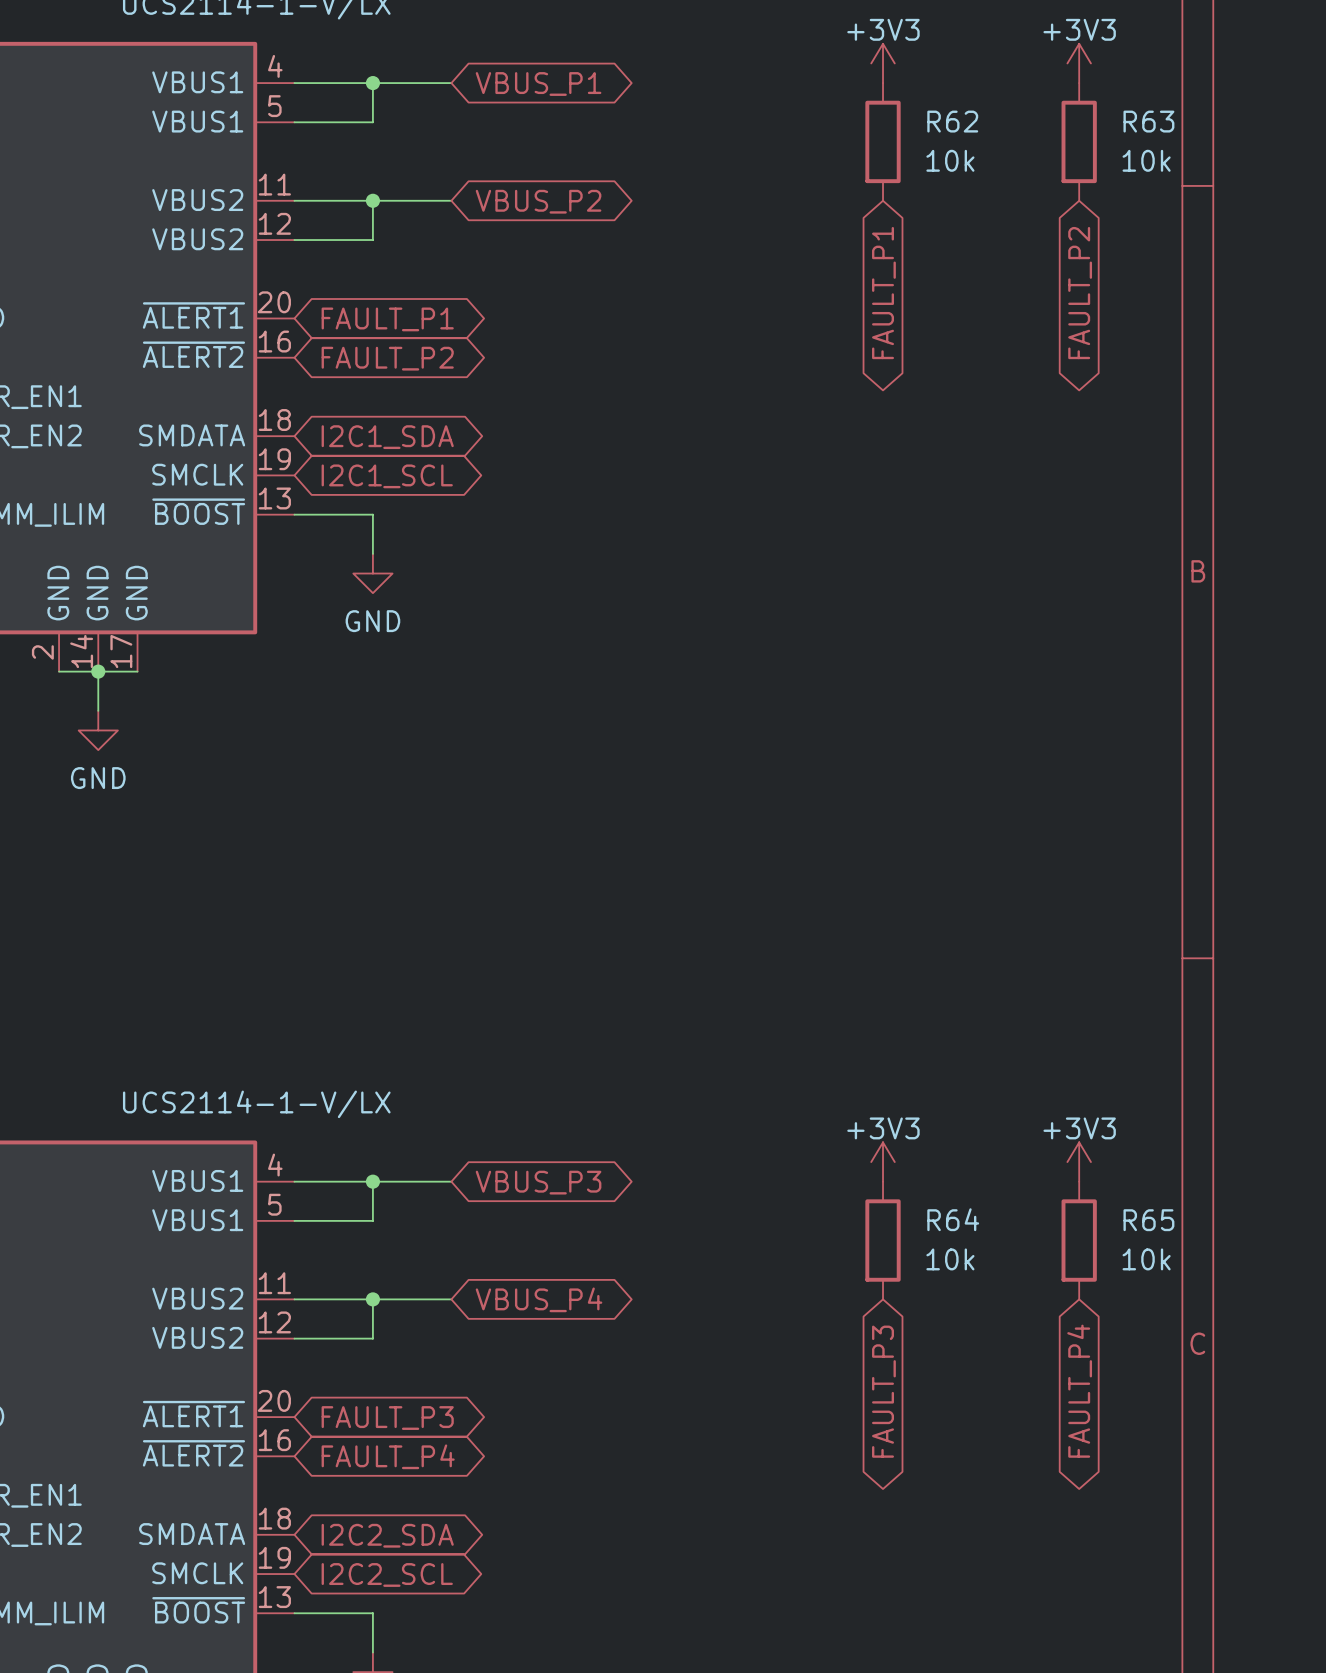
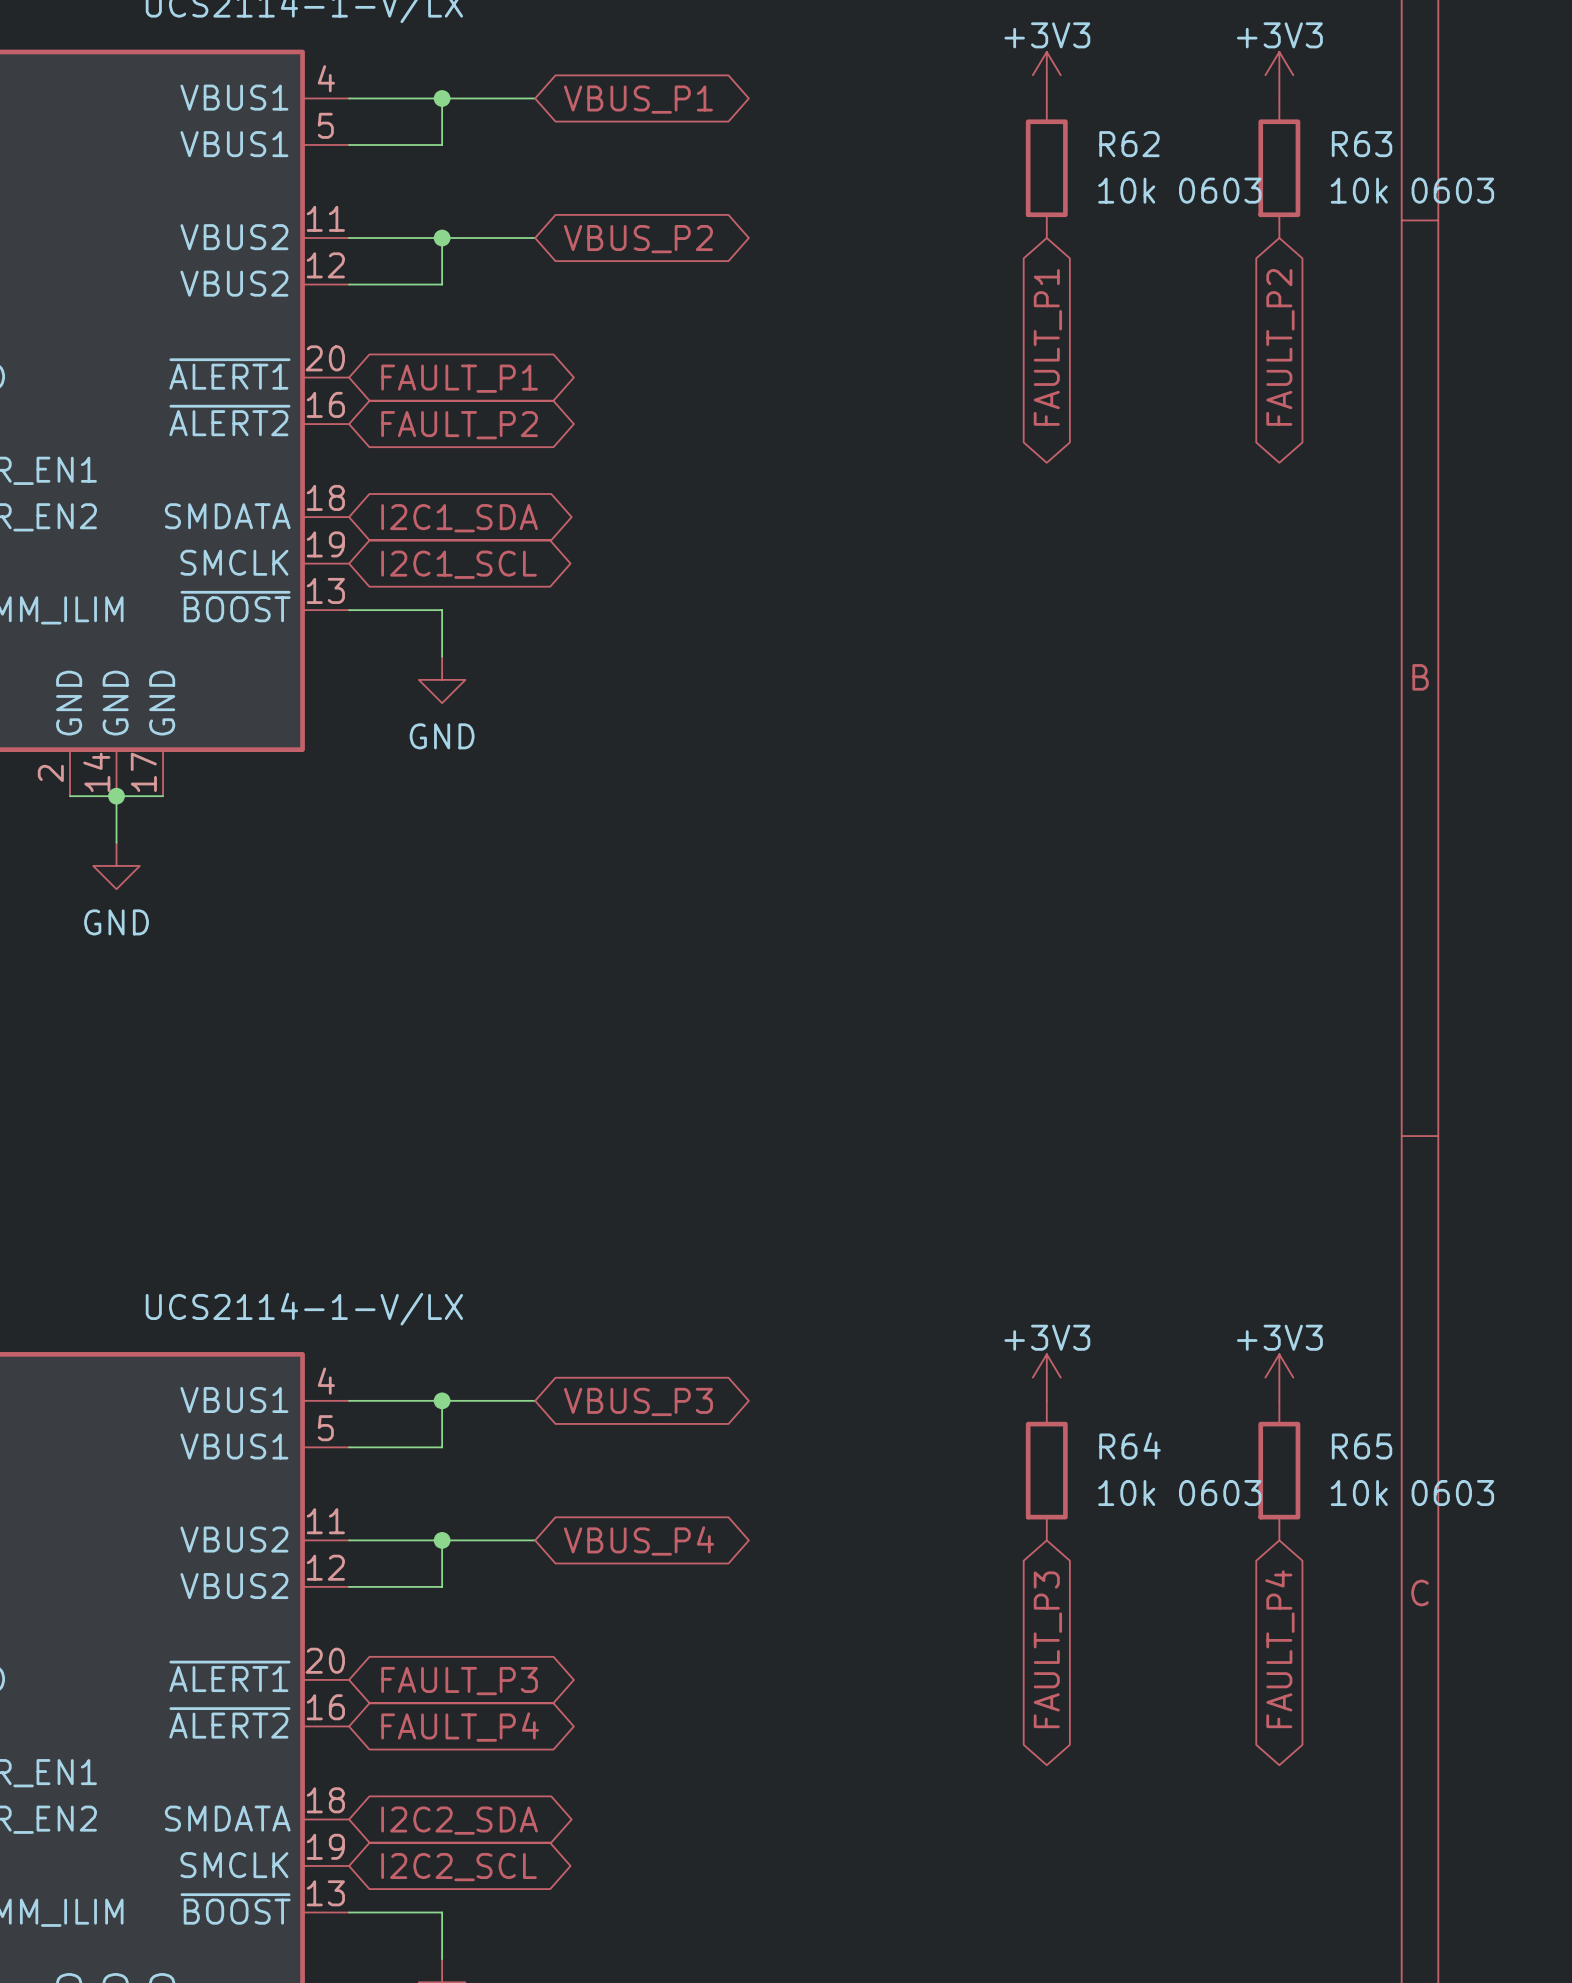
R62 value: 10k (950, 160) -> 10k 0603 (1179, 190)
R63 value: 10k (1146, 160) -> 10k 0603 (1412, 190)
R64 value: 10k (950, 1259) -> 10k 0603 (1179, 1493)
R65 value: 10k (1146, 1259) -> 10k 0603 (1412, 1493)

